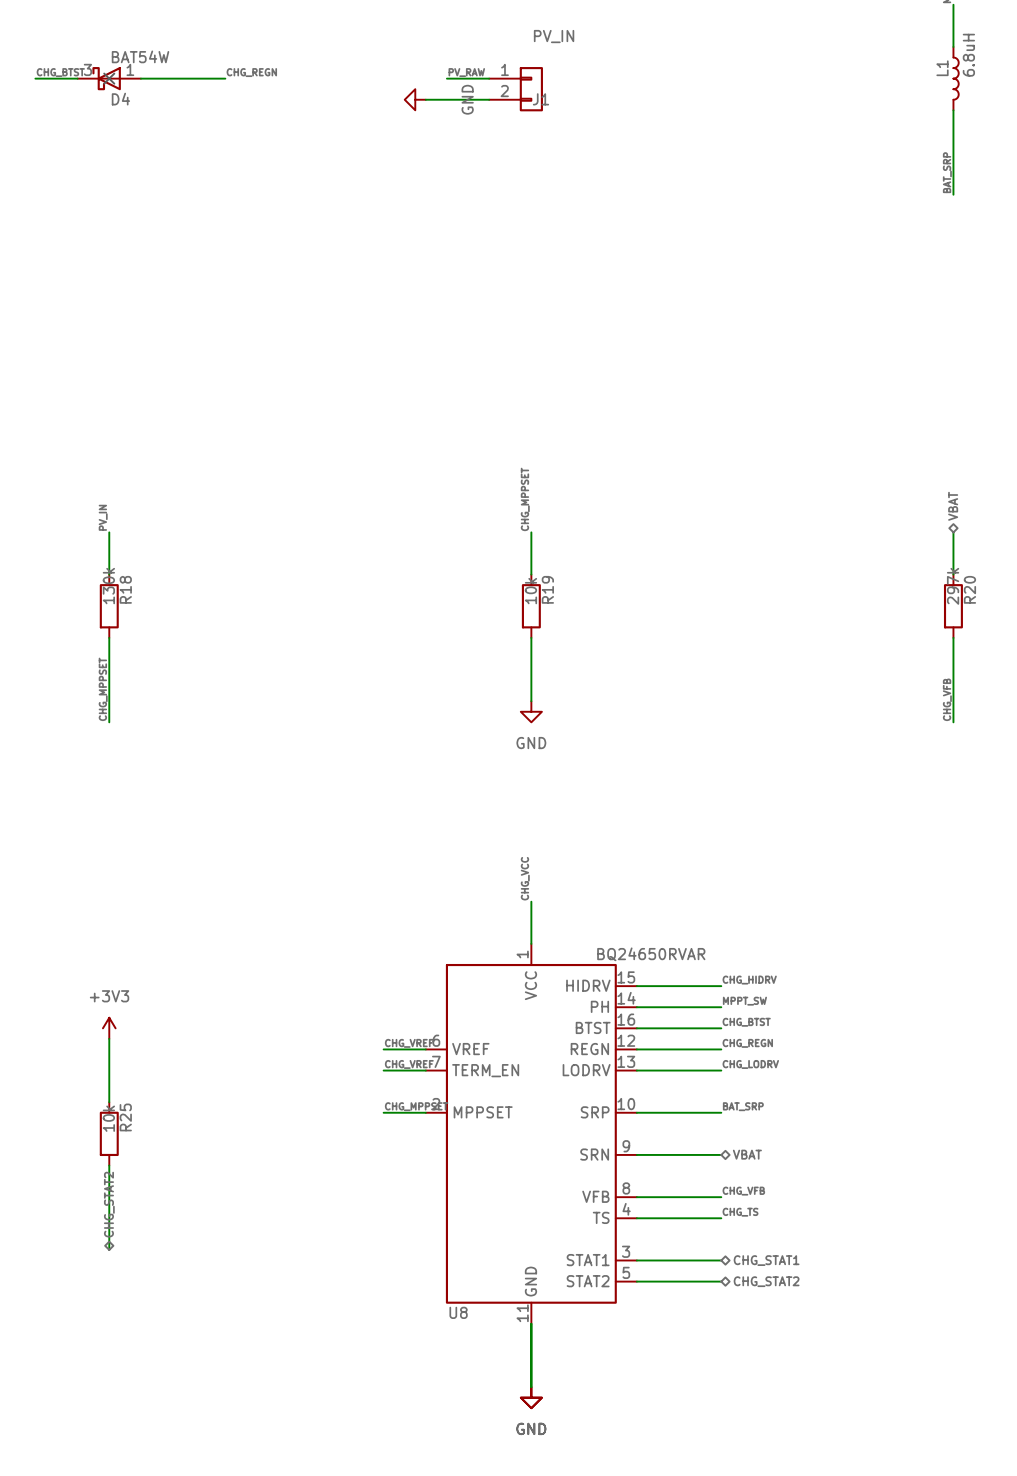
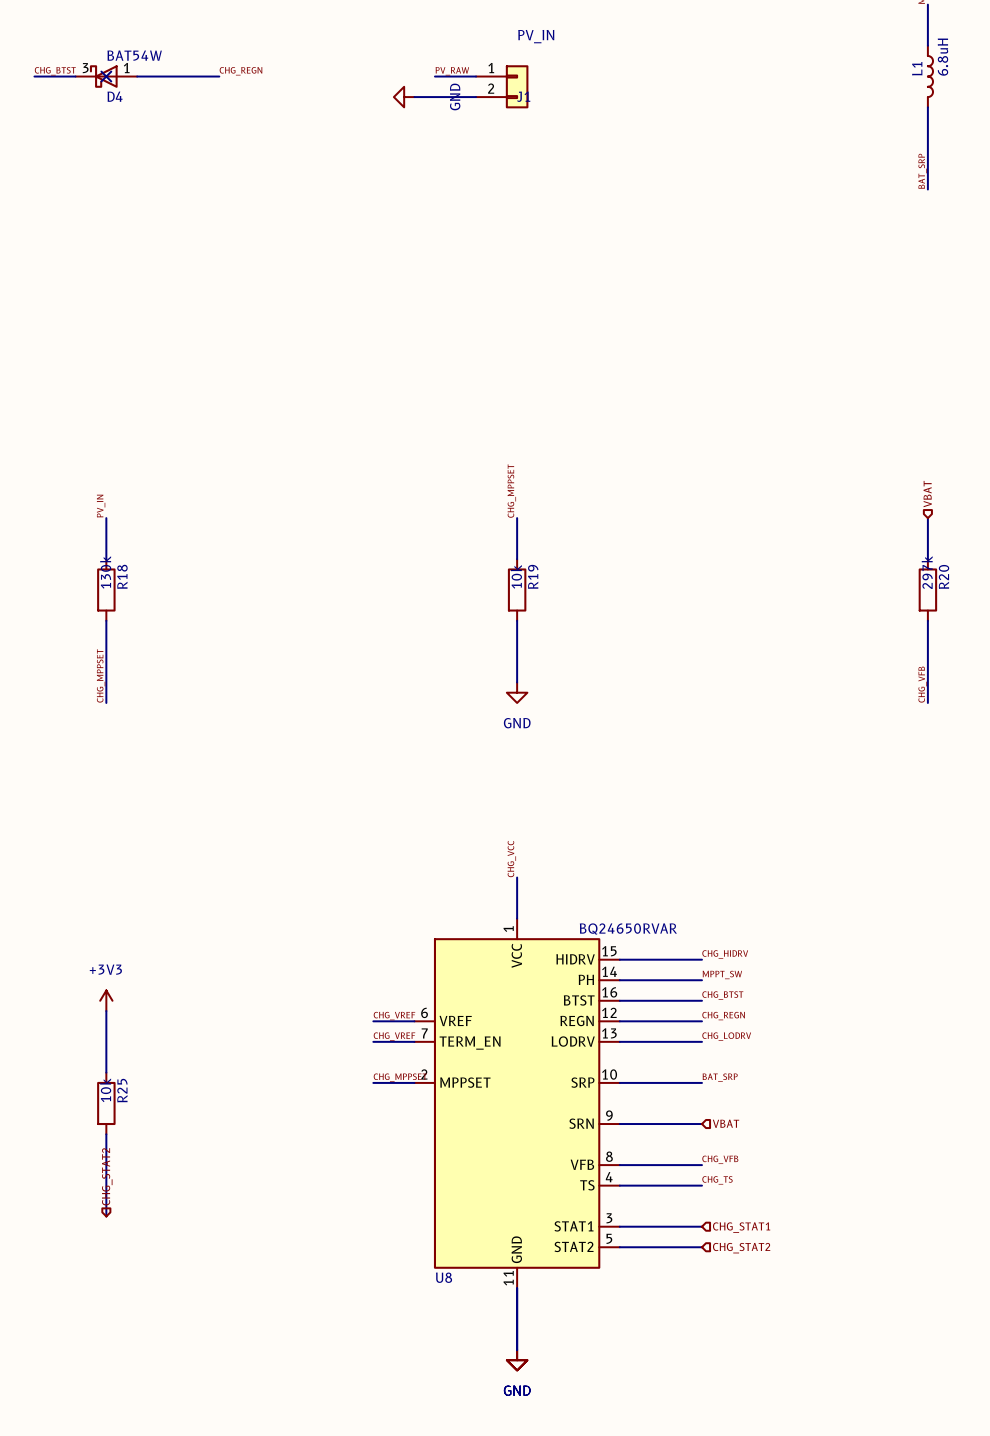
hierarchical label shape: bidirectional (953, 506) -> input (927, 494)
hierarchical label shape: bidirectional (747, 1154) -> input (726, 1123)
hierarchical label shape: bidirectional (109, 1204) -> input (107, 1176)
hierarchical label shape: bidirectional (766, 1260) -> input (741, 1227)
hierarchical label shape: bidirectional (766, 1281) -> input (741, 1248)

